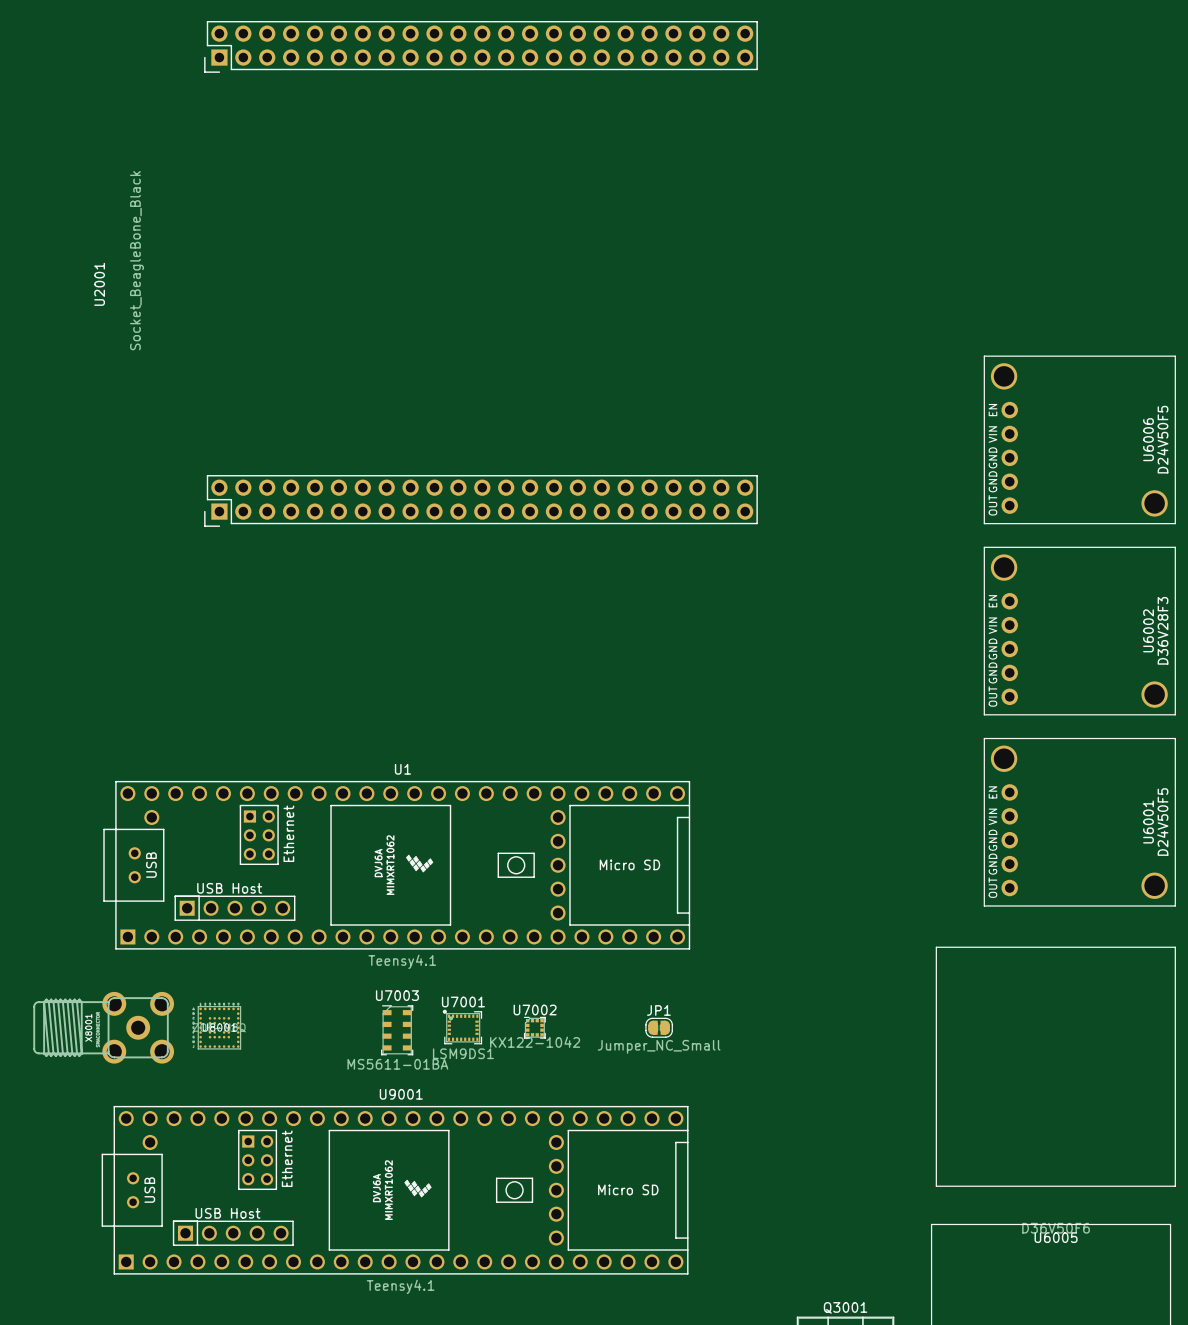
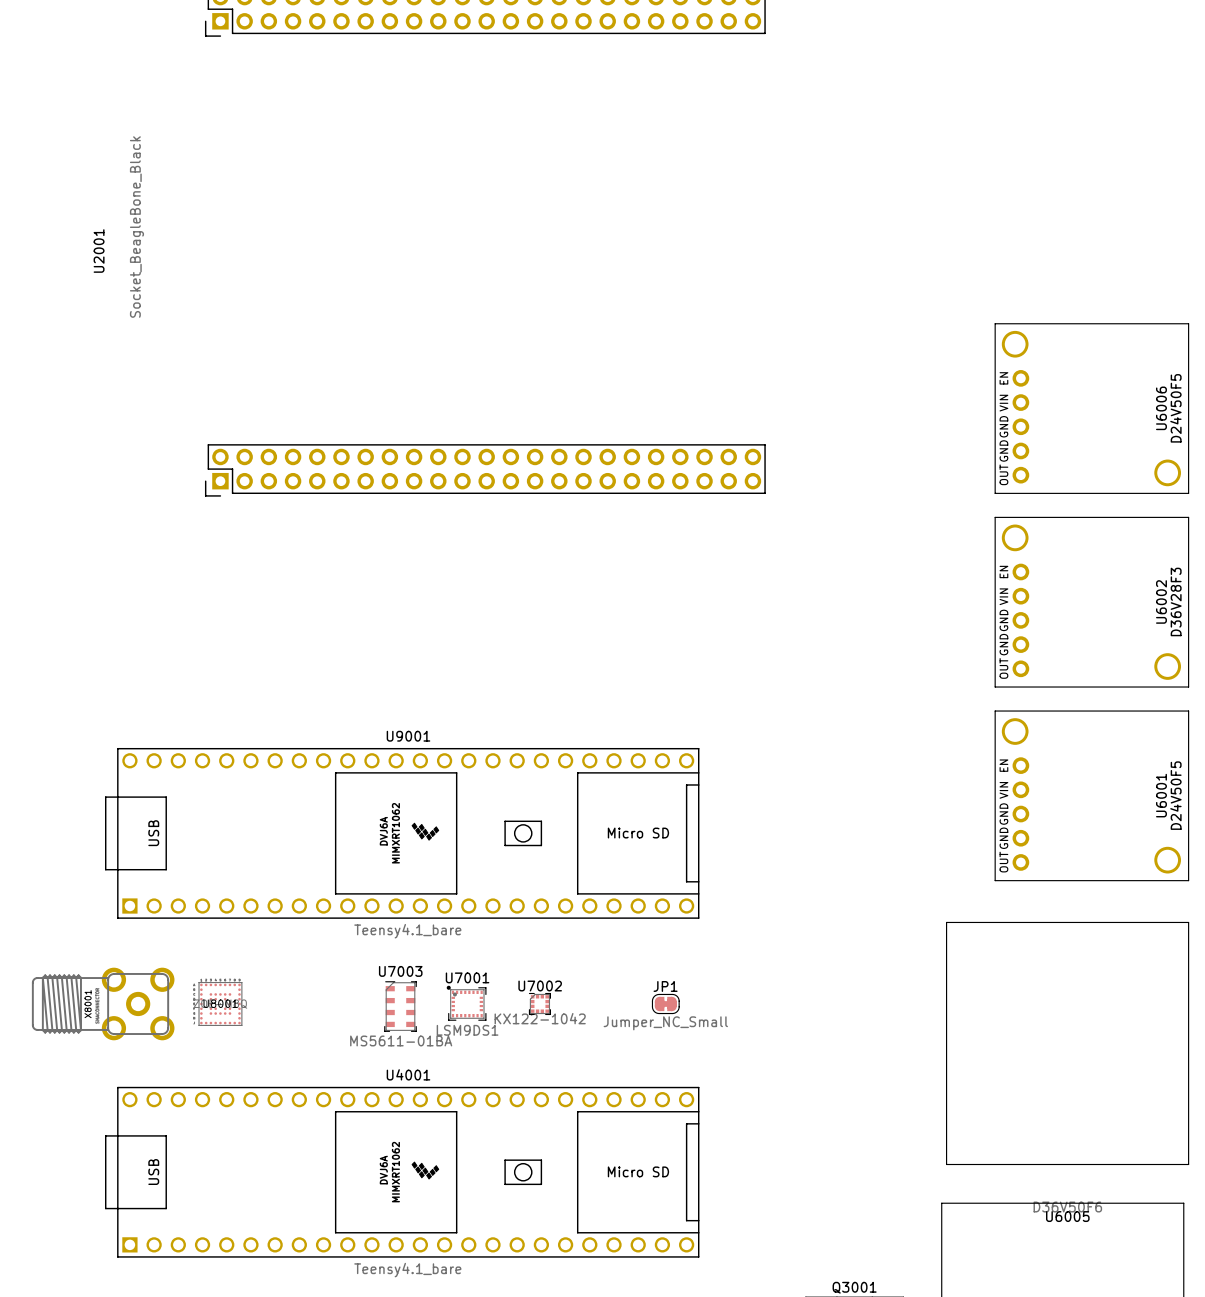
U1: Teensy4.1 (396, 865) -> none
U9001 footprint: [101, 1105, 689, 1275] -> [105, 747, 700, 919]
U4001: none -> Teensy4.1_bare (402, 1172)
U9001 value: Teensy4.1 (400, 1286) -> Teensy4.1_bare (407, 931)

